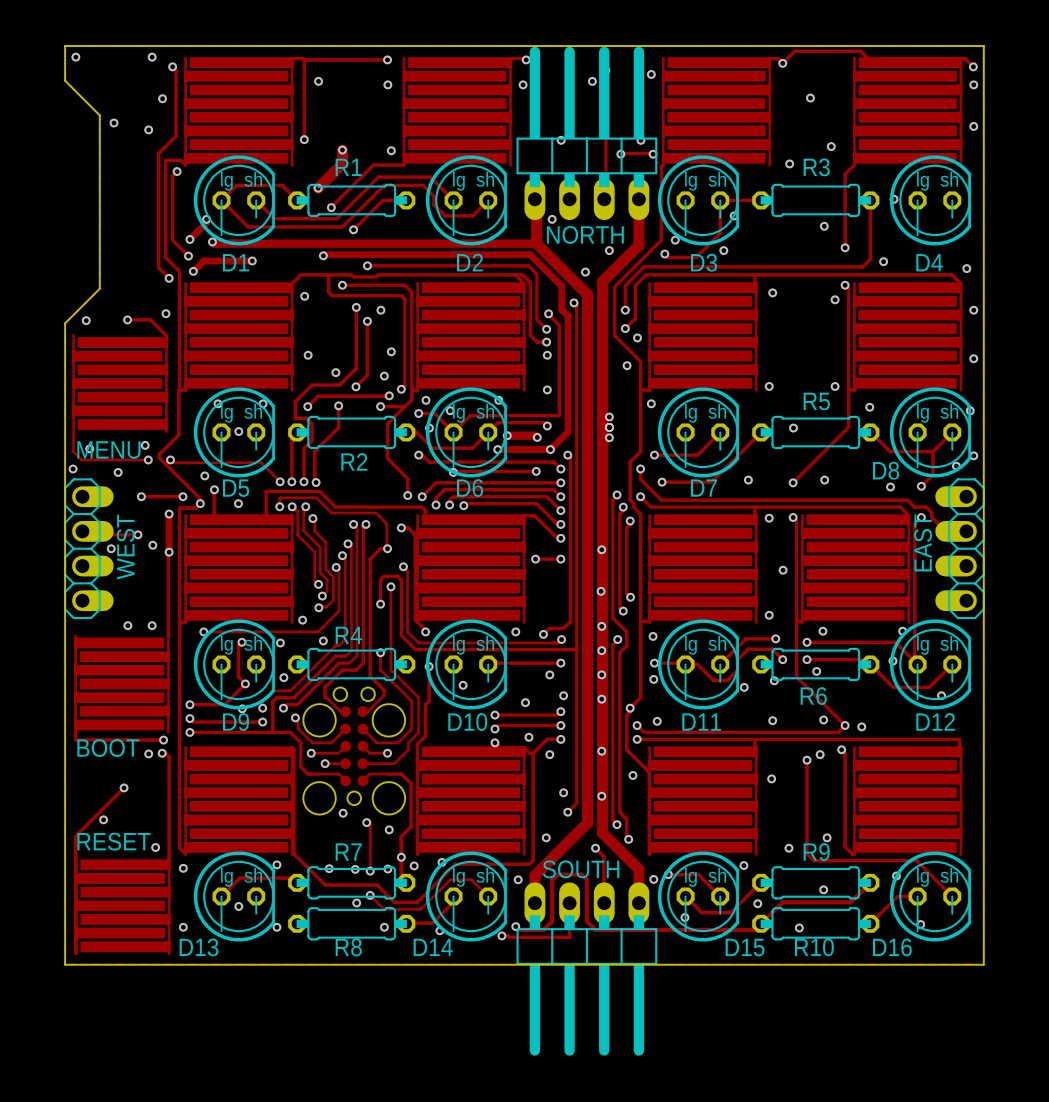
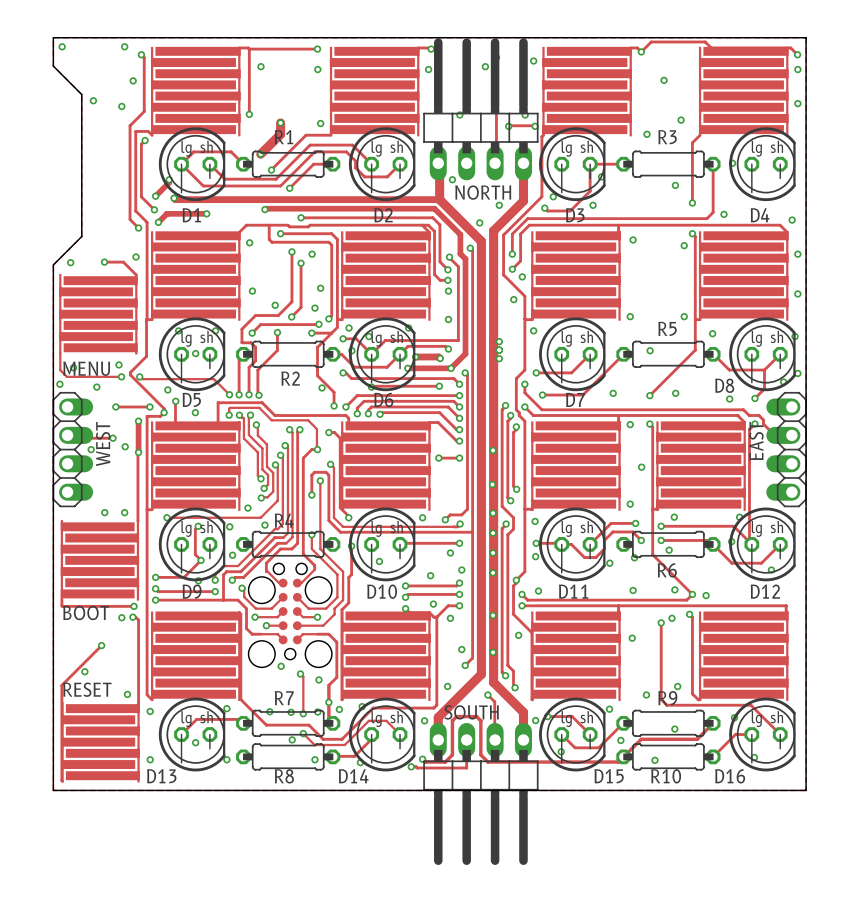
via: none -> (322, 387)

